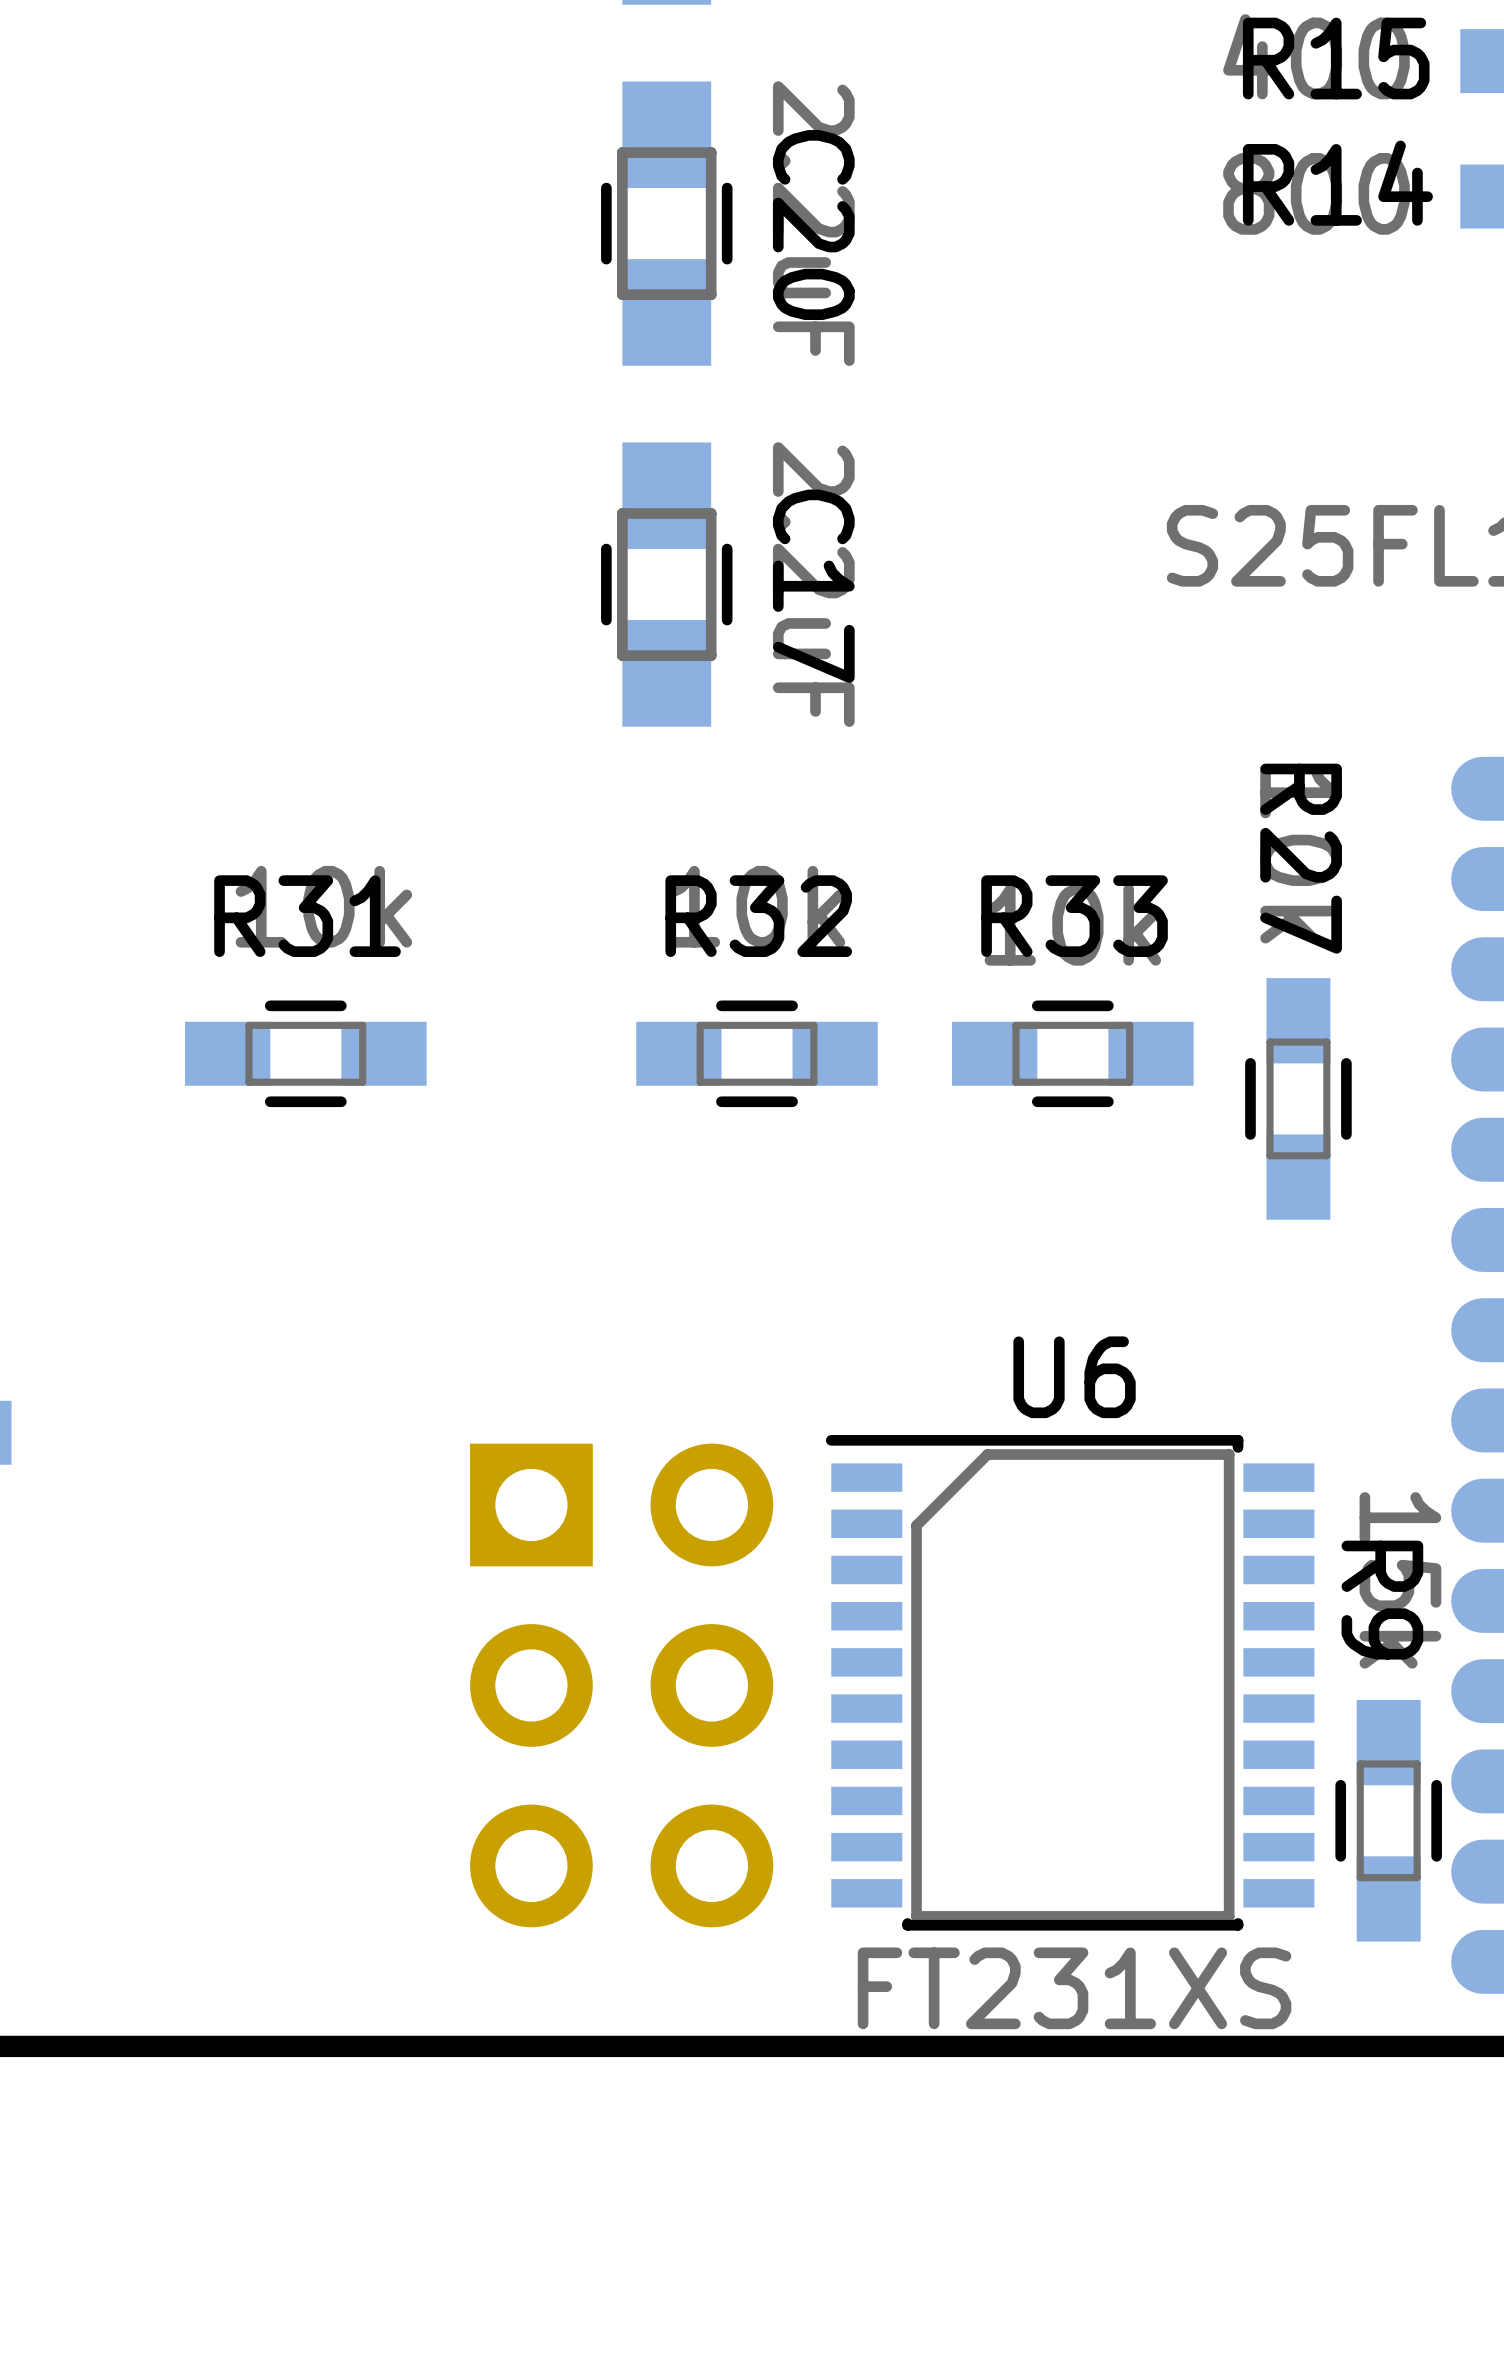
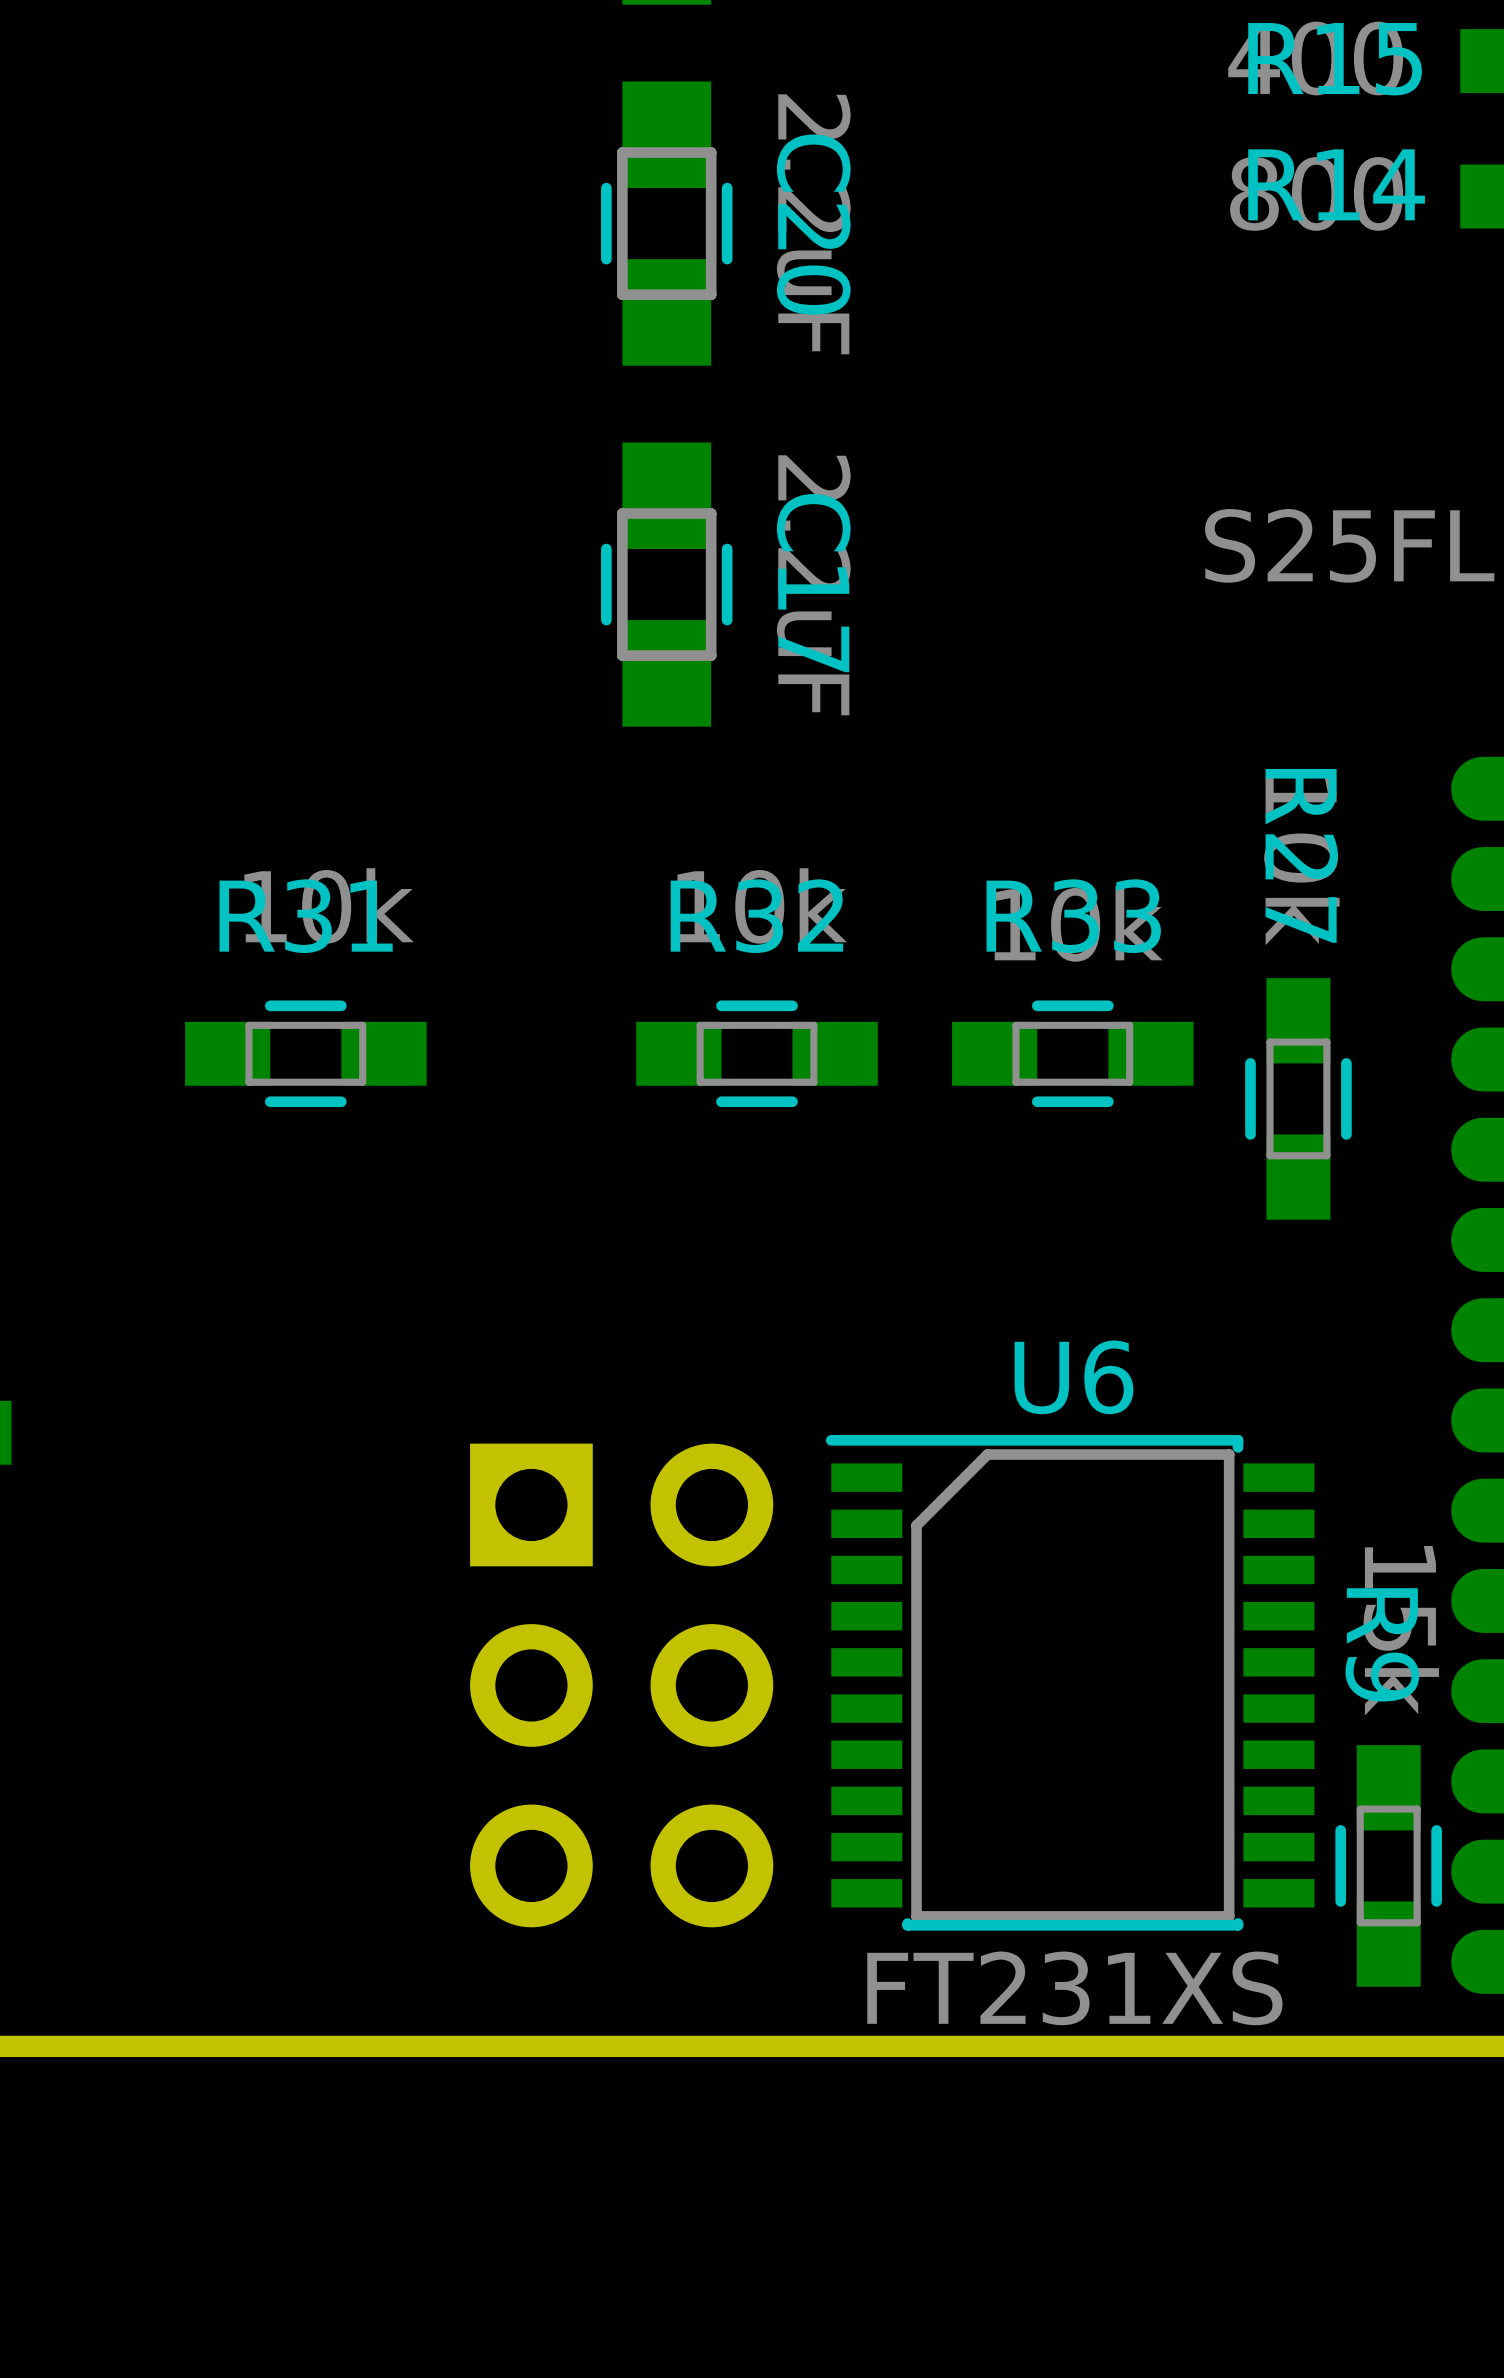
R9 position: (1388, 1820) -> (1388, 1865)

